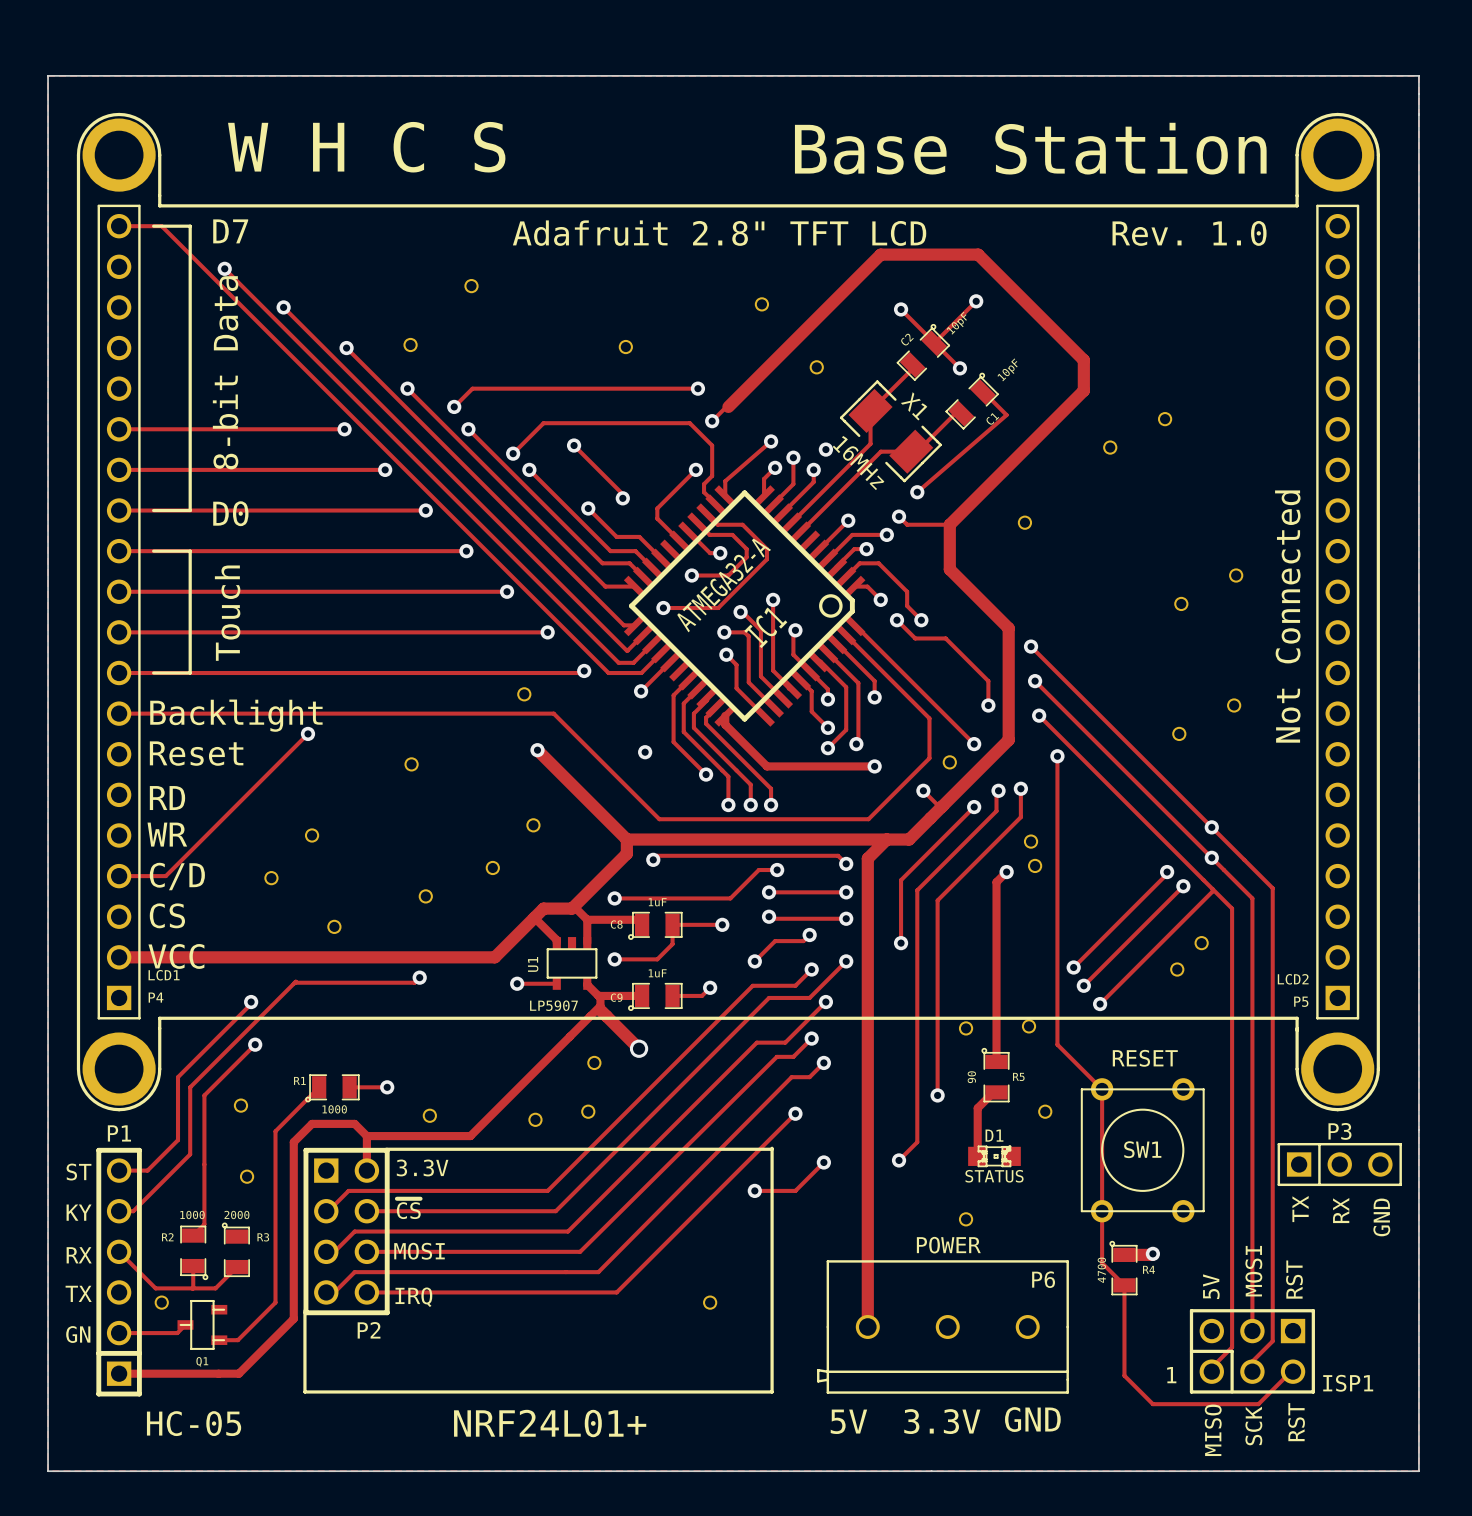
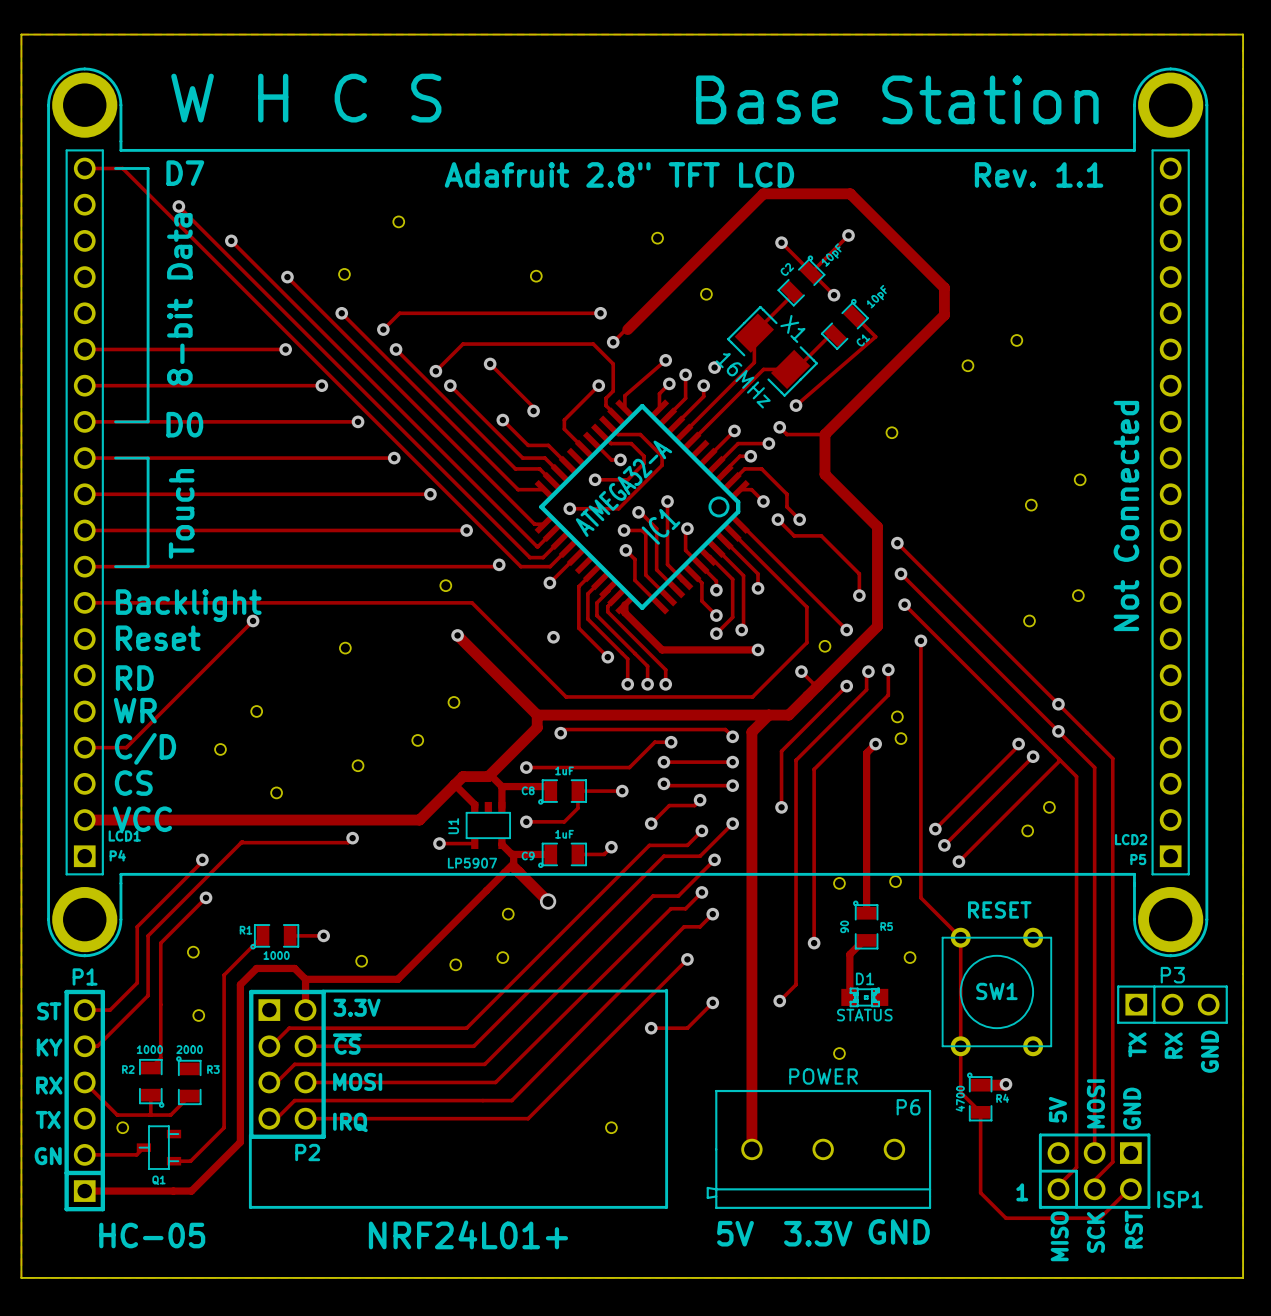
text: Rev. 1.0 (1189, 233) -> Rev. 1.1 (1039, 174)
text: RST (1294, 1279) -> GND (1132, 1108)

